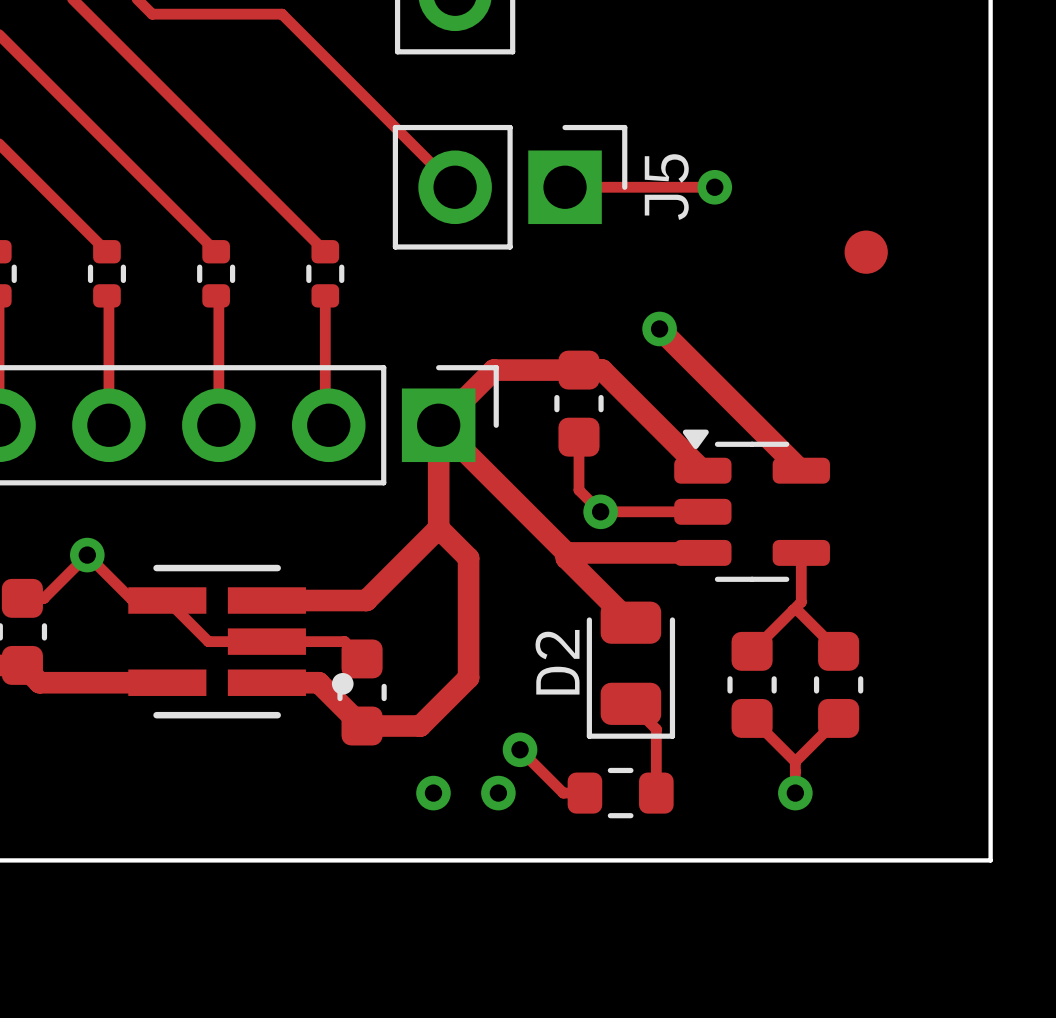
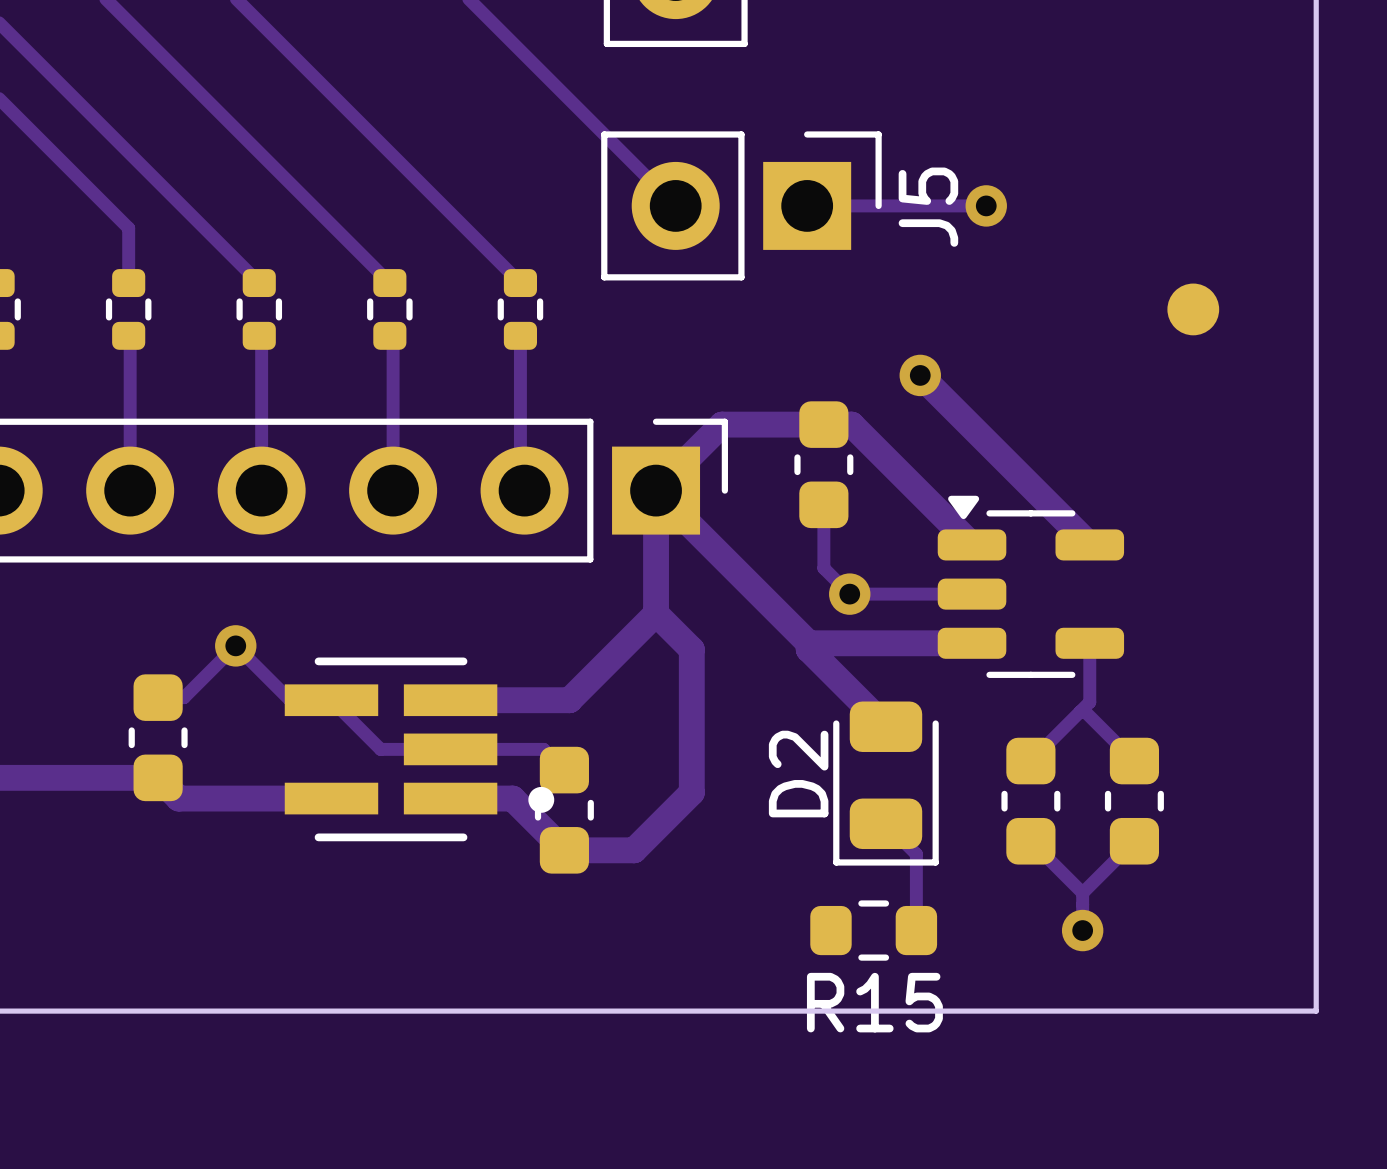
part position: (866, 252) -> (1193, 309)
track: (520, 749) (563, 793) (584, 793) -> none
via: (520, 749) -> none
via: (433, 793) -> none
via: (498, 793) -> none
R15 name: none -> R15 (874, 1002)

